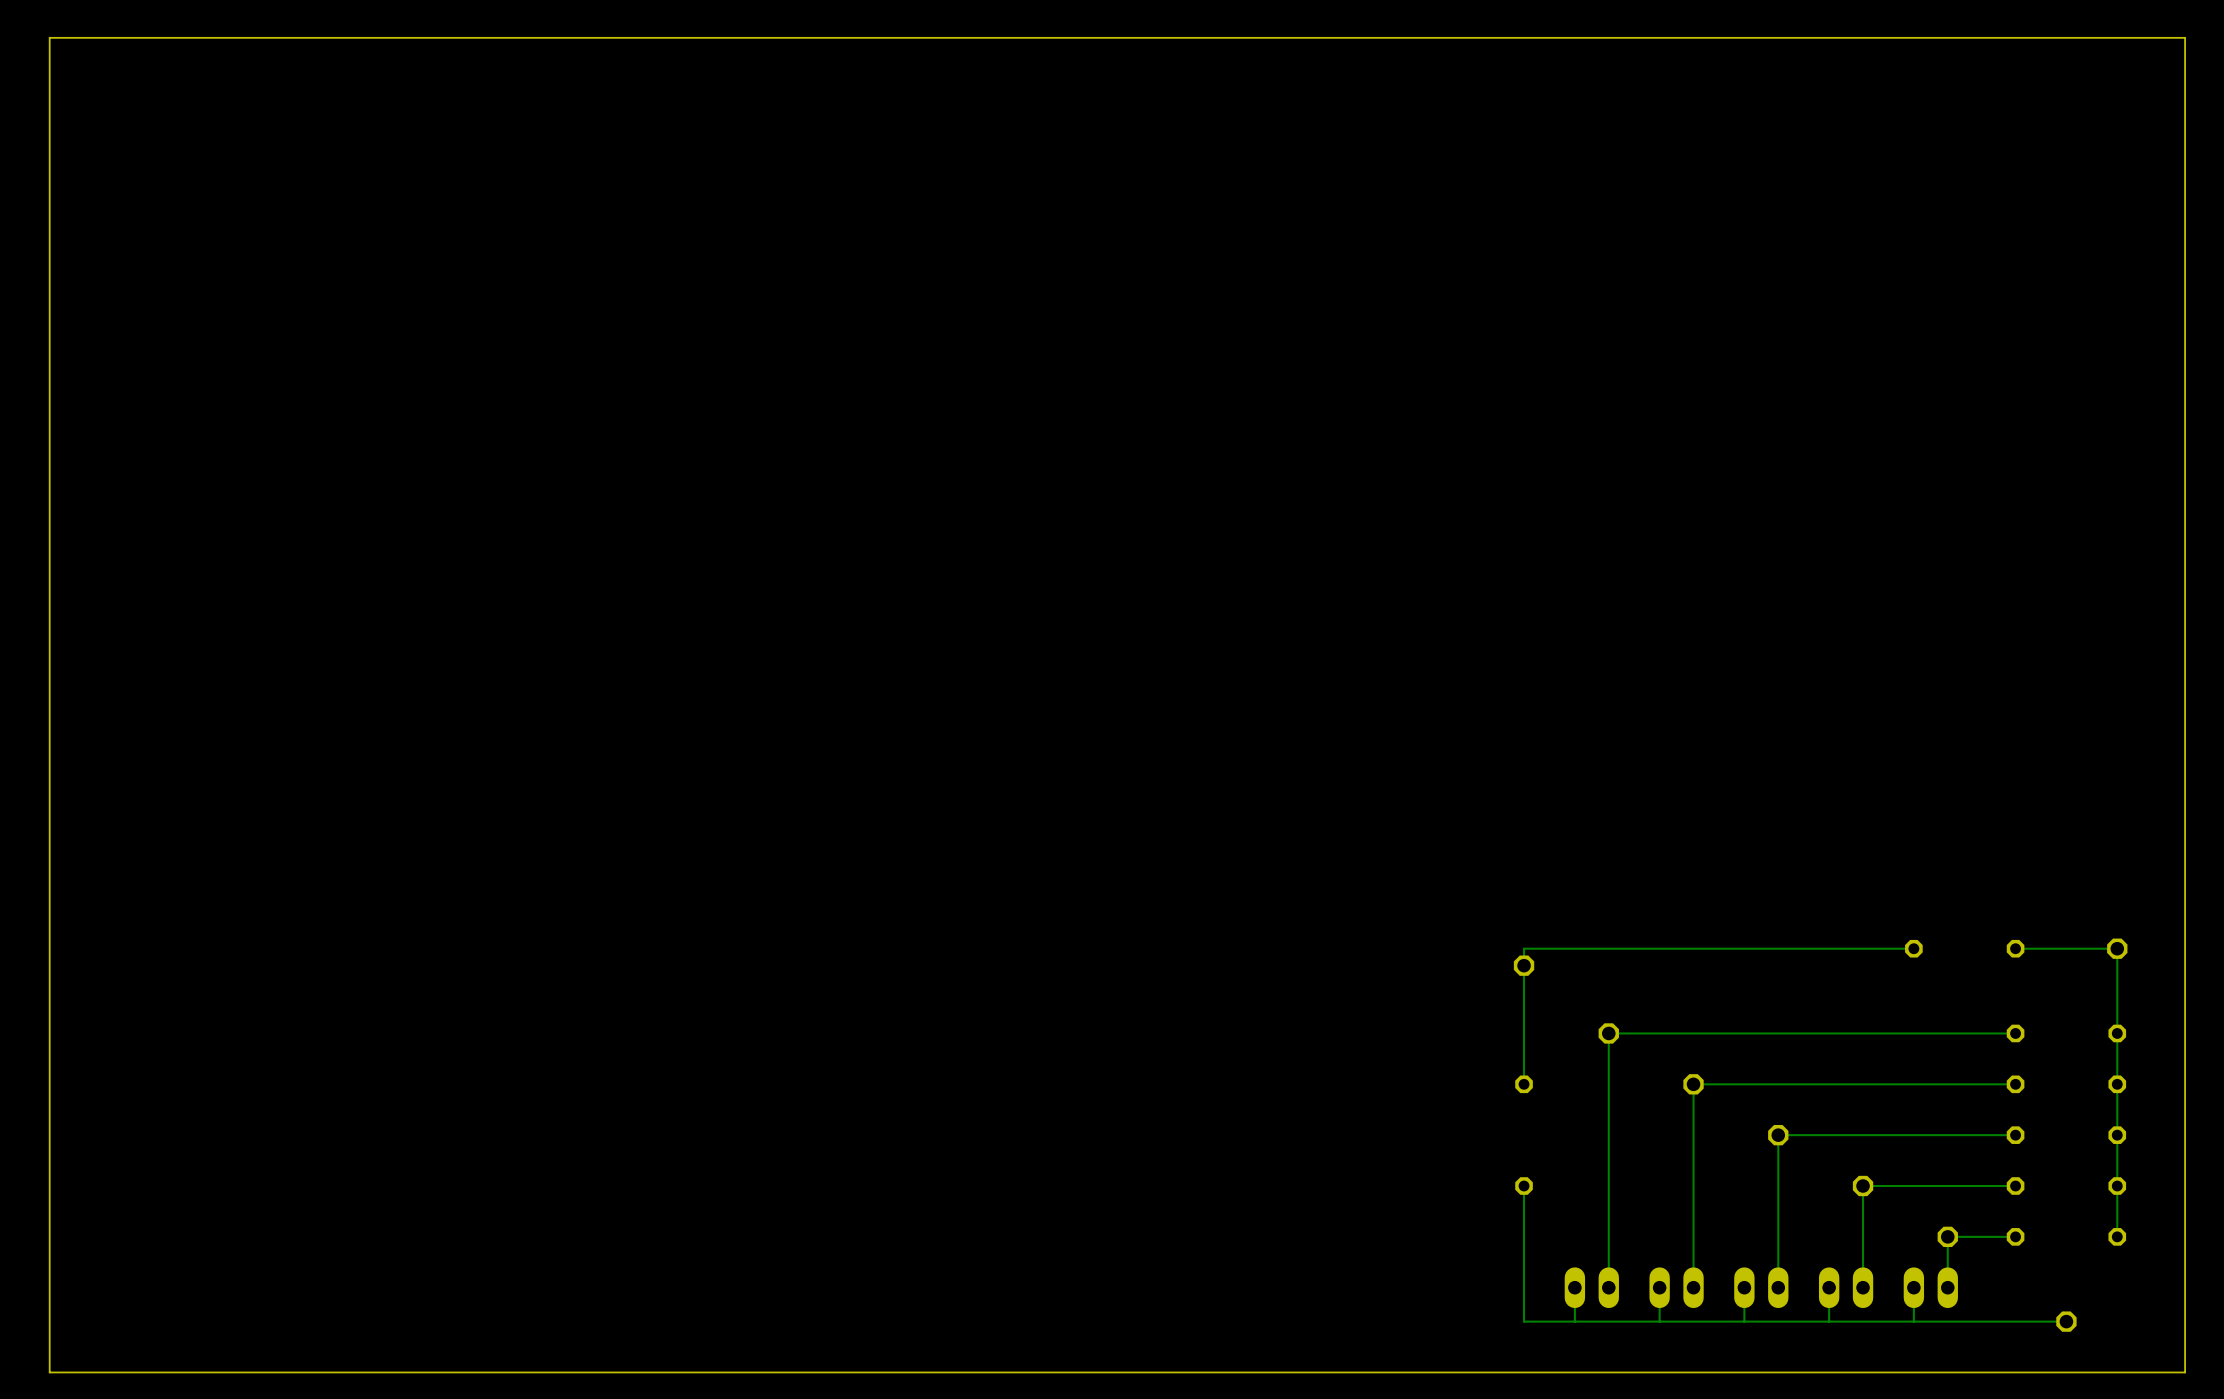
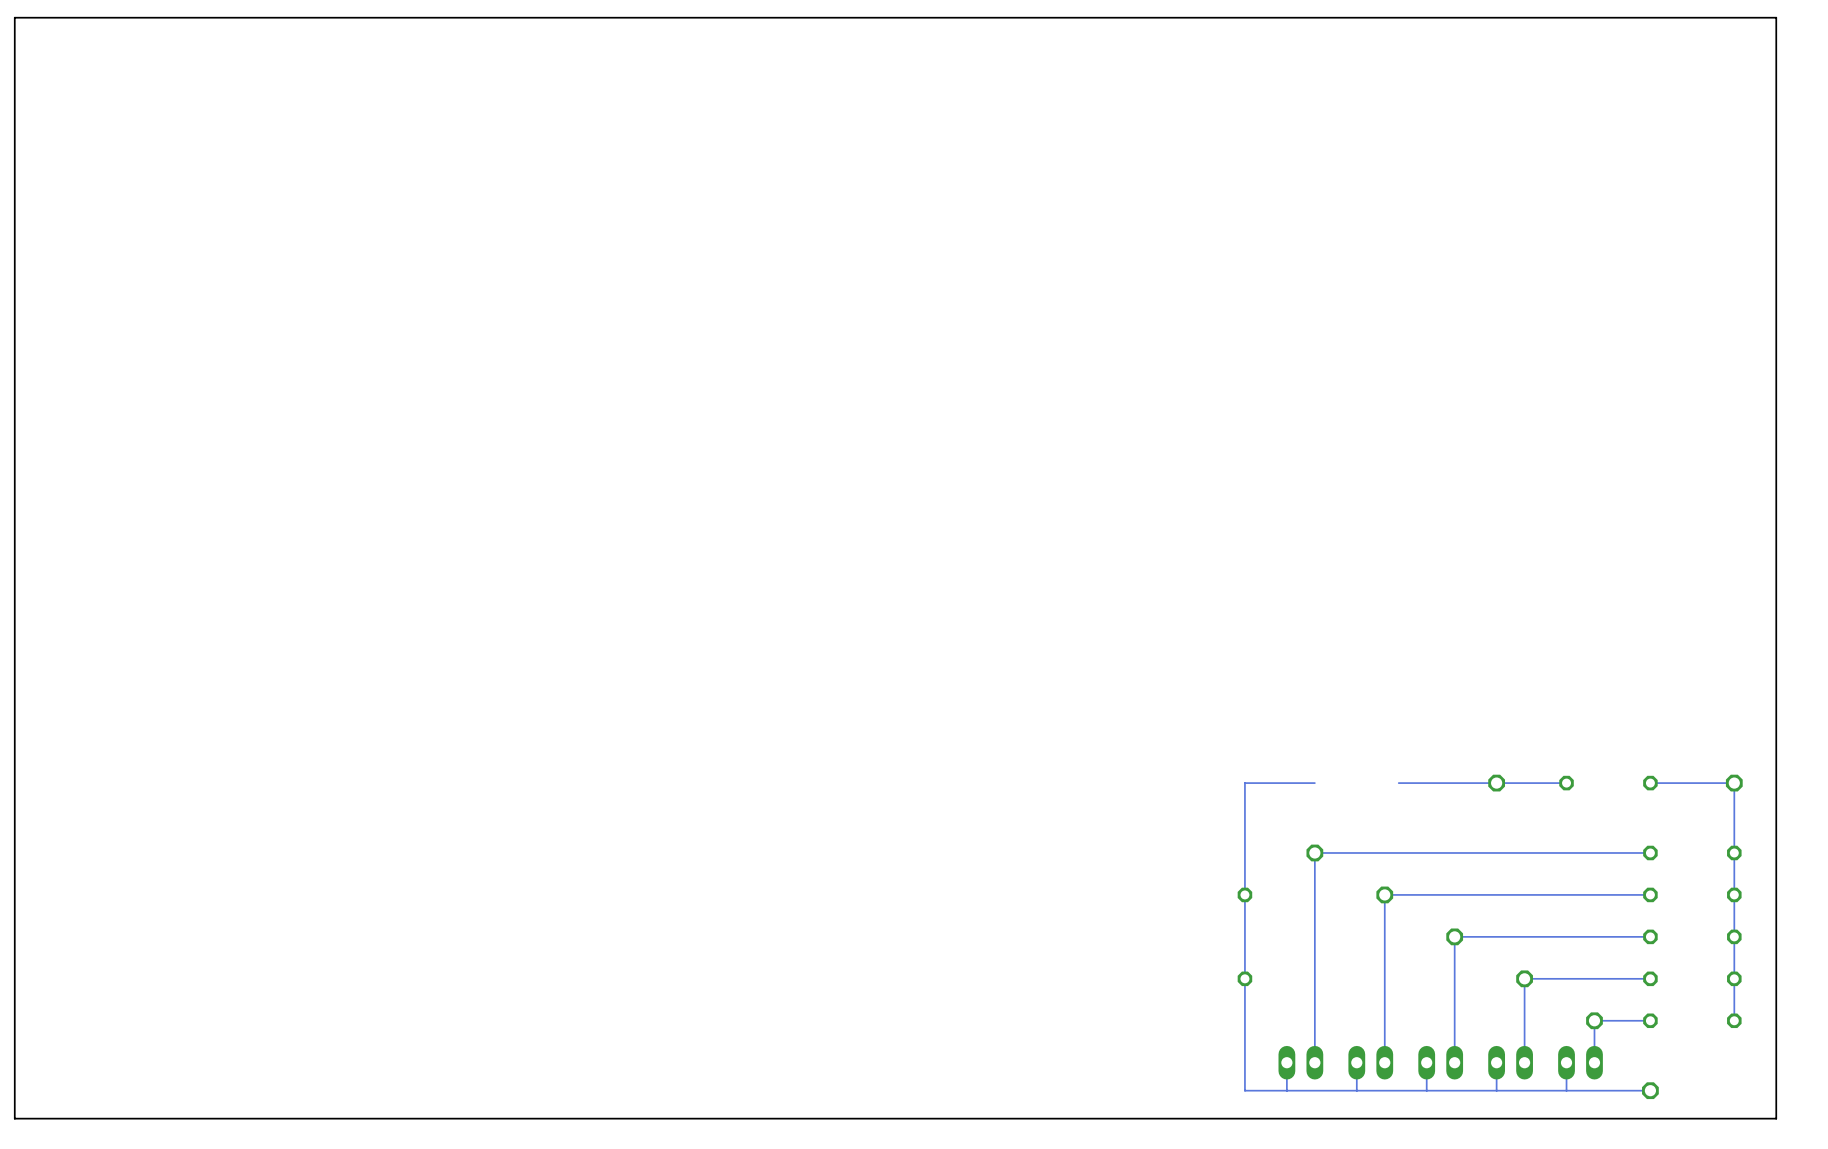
board edge: (2185, 37) (49, 37) (49, 1372) (2185, 1372) (2185, 37) -> (1776, 17) (14, 17) (14, 1118) (1776, 1118) (1776, 17)
track: (1710, 948) (1608, 948) -> none
part: none -> (1496, 783)
part: (1524, 965) -> none
track: none -> (1244, 894) (1244, 978)
track: (2066, 1321) (2015, 1321) -> none
part position: (2066, 1321) -> (1650, 1090)

